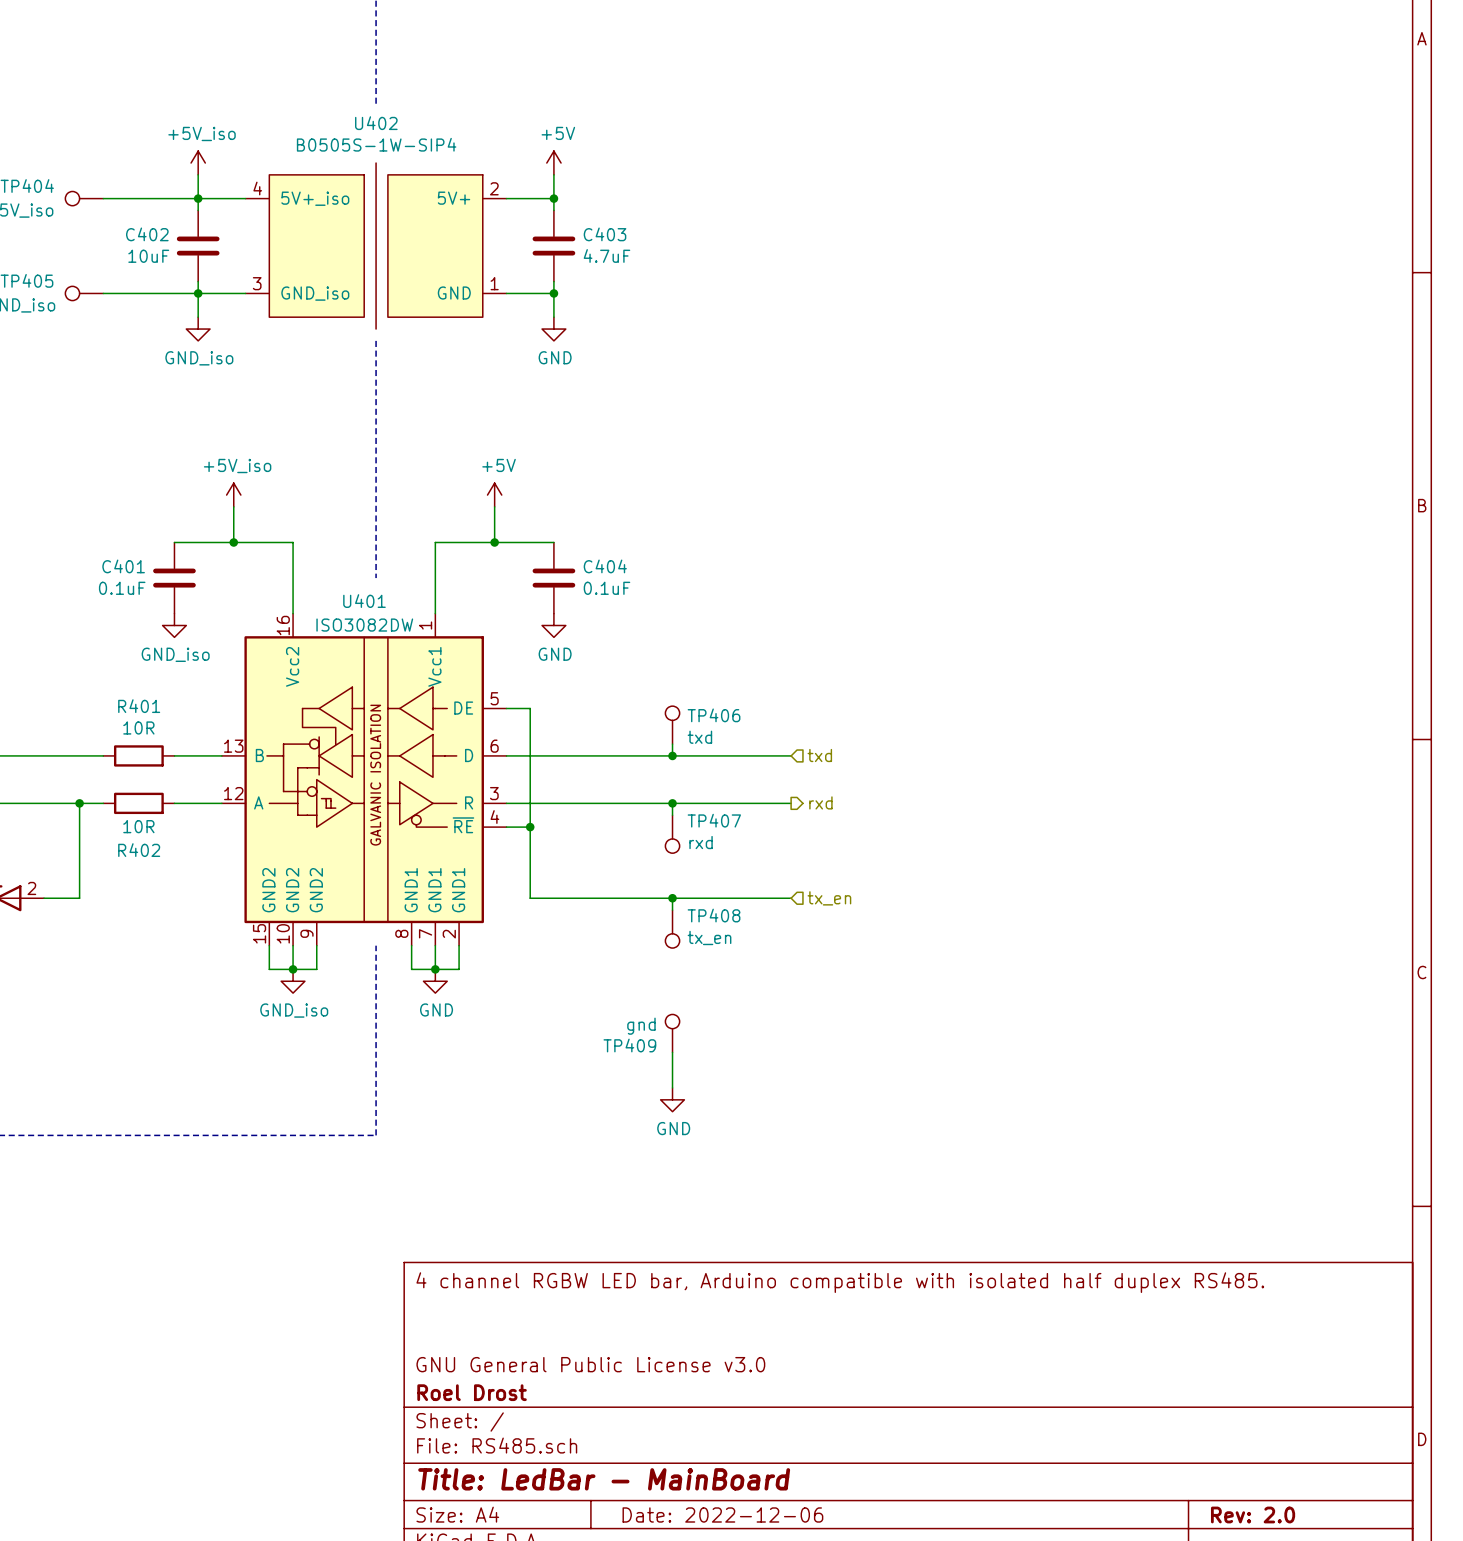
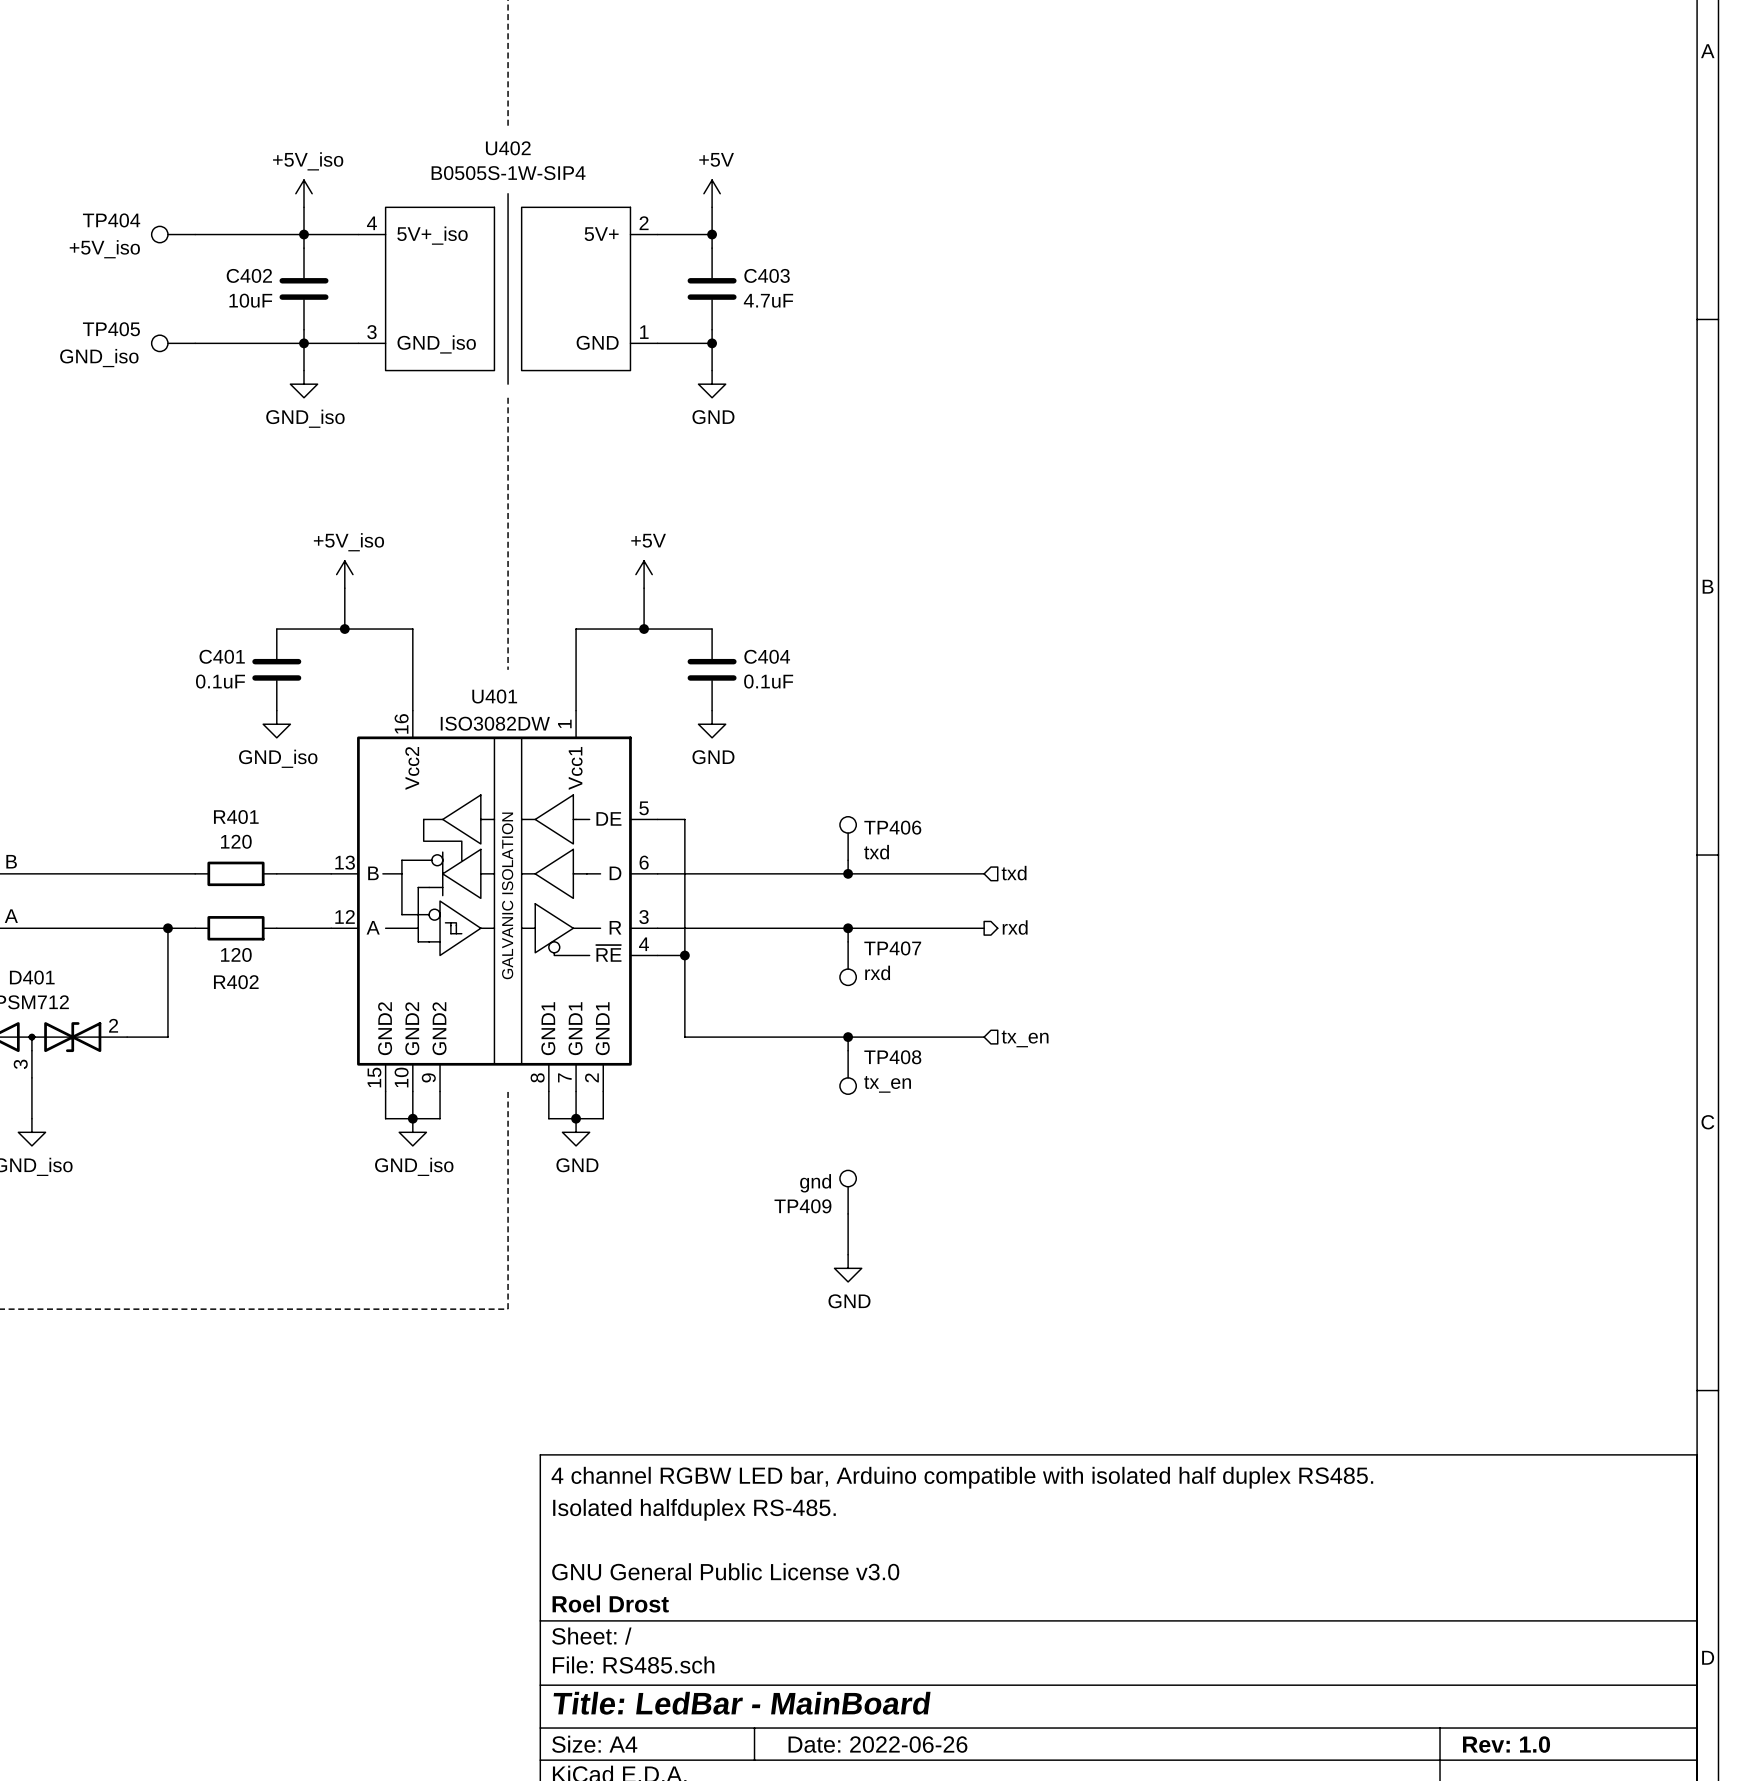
R401 value: 10R (138, 727) -> 120 (236, 841)
R402 value: 10R (138, 826) -> 120 (236, 954)
title block: none -> Isolated halfduplex RS-485. (694, 1509)
title block: Date: 2022-12-06 (722, 1514) -> Date: 2022-06-26 (877, 1744)
title block: Rev: 2.0 (1253, 1514) -> Rev: 1.0 (1506, 1744)

